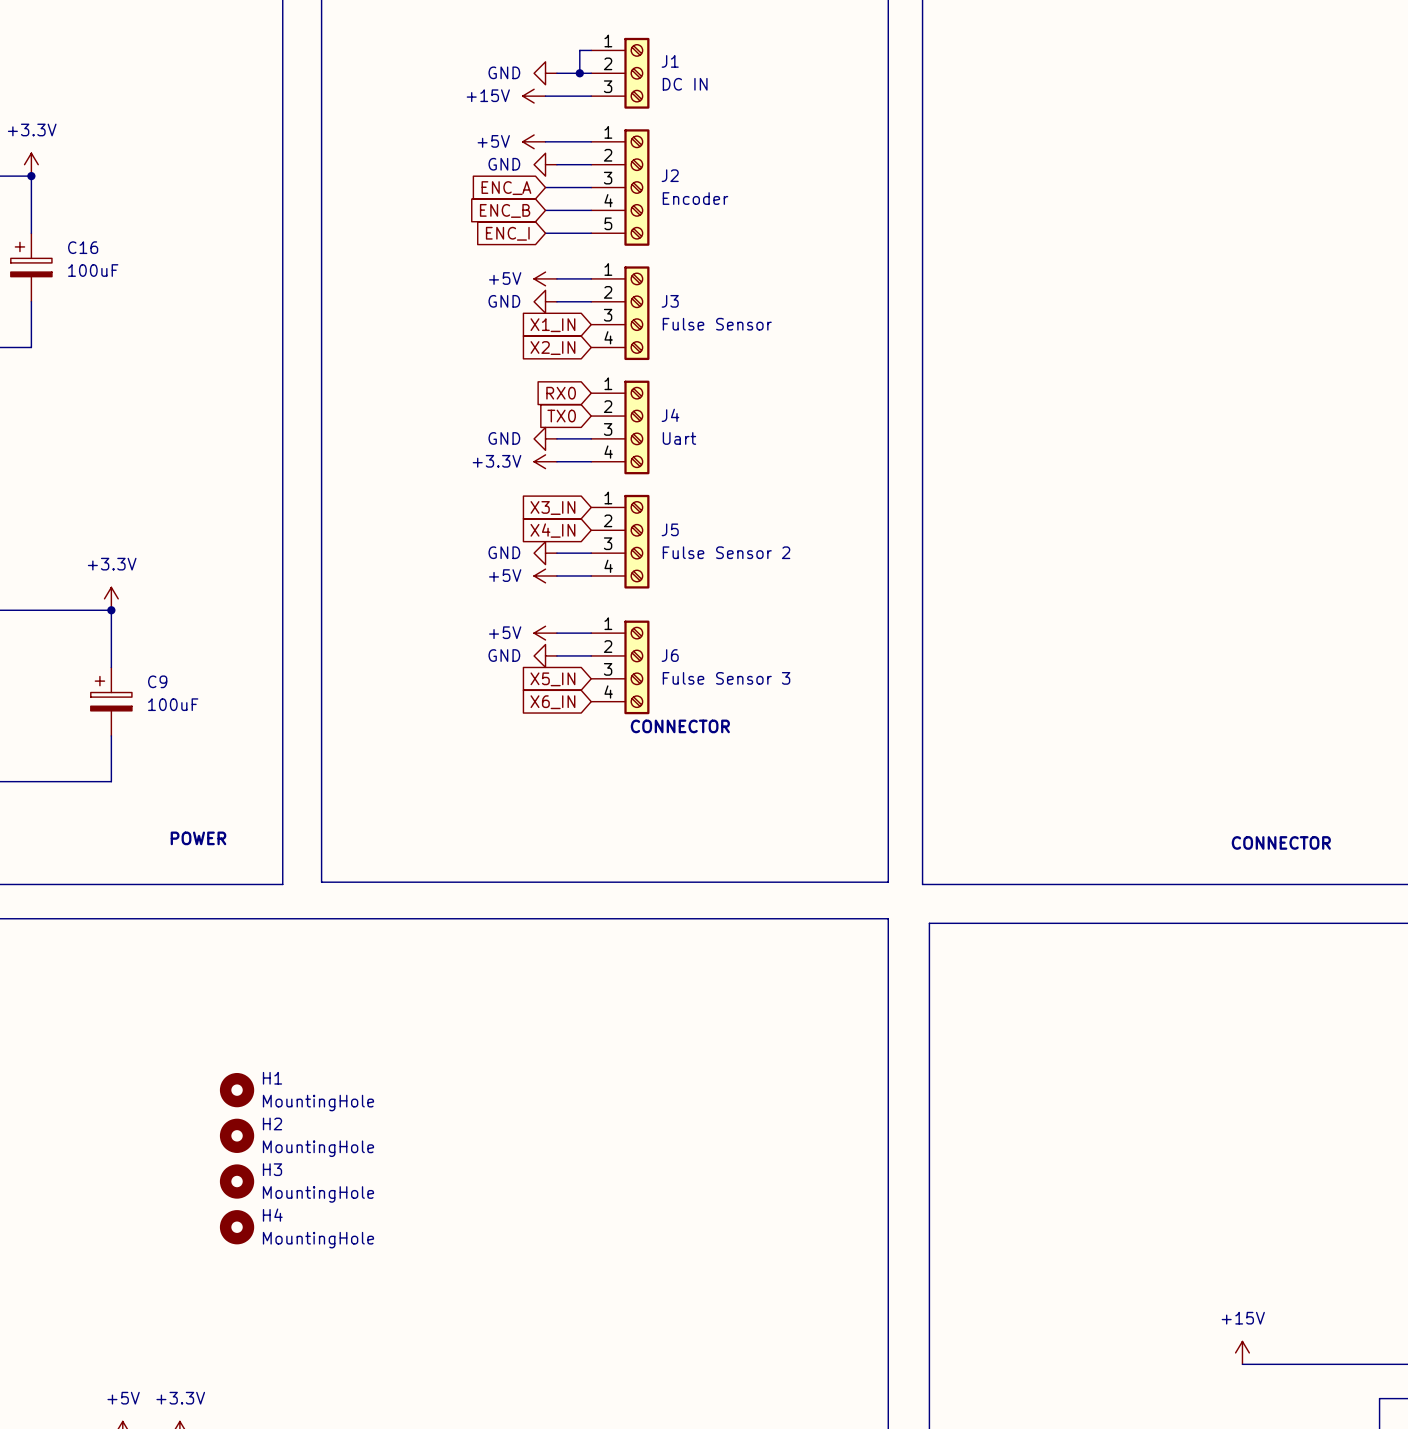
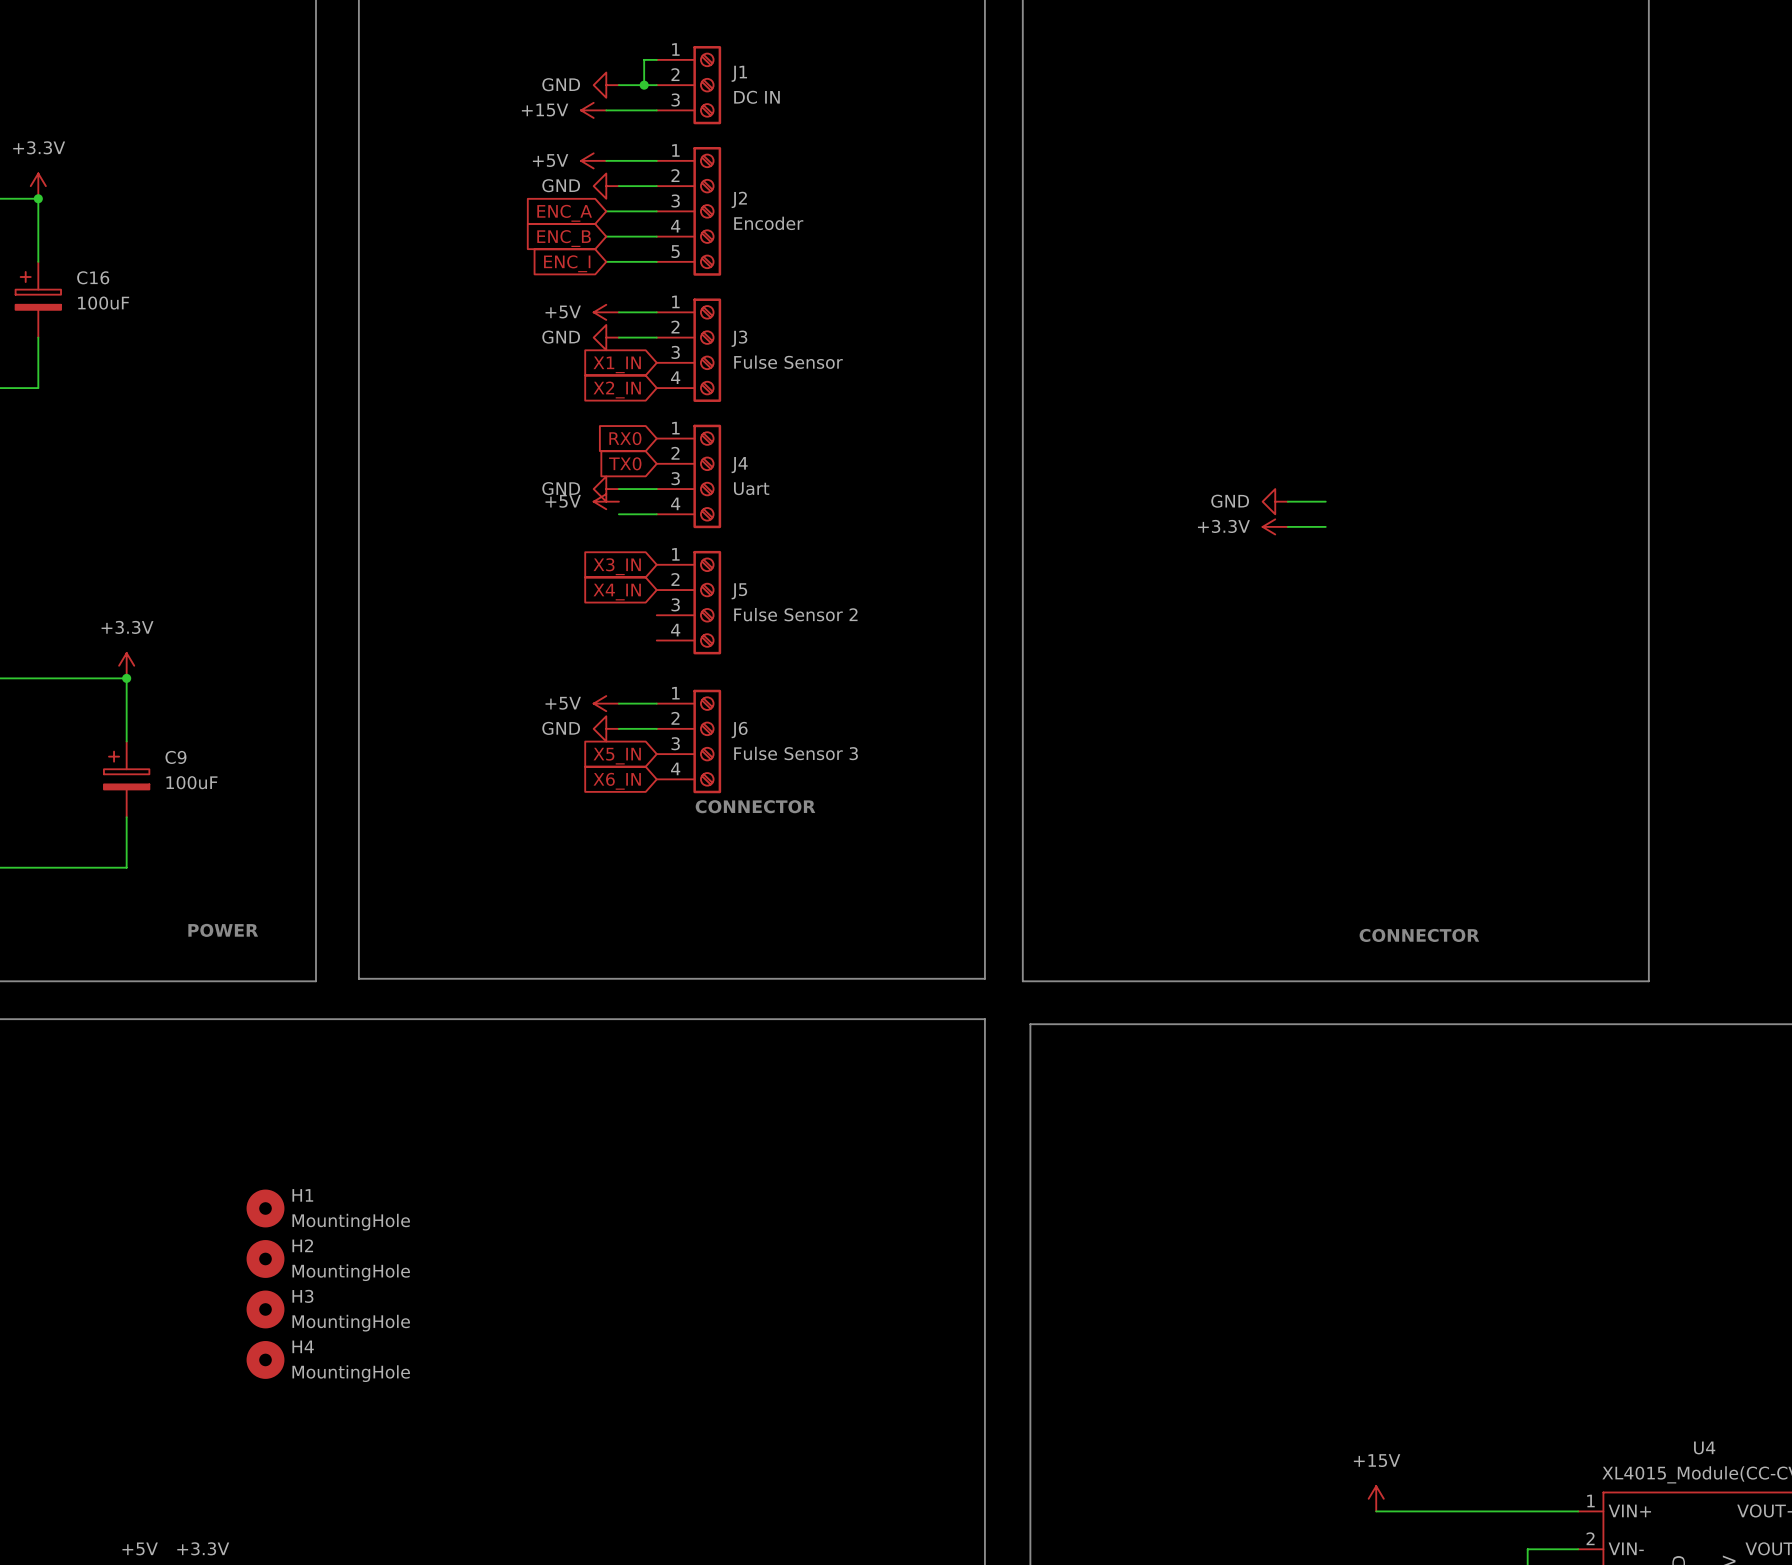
power symbol: none -> GND (1275, 501)
wire: none -> (1287, 501) (1325, 501)
power symbol: +3.3V (545, 461) -> none
power symbol: none -> +3.3V (1275, 526)
wire: none -> (1287, 526) (1325, 526)
power symbol: GND (545, 553) -> none
wire: (556, 553) (591, 553) -> none
power symbol position: +5V (545, 575) -> +5V (606, 501)
wire: (556, 575) (591, 575) -> none

